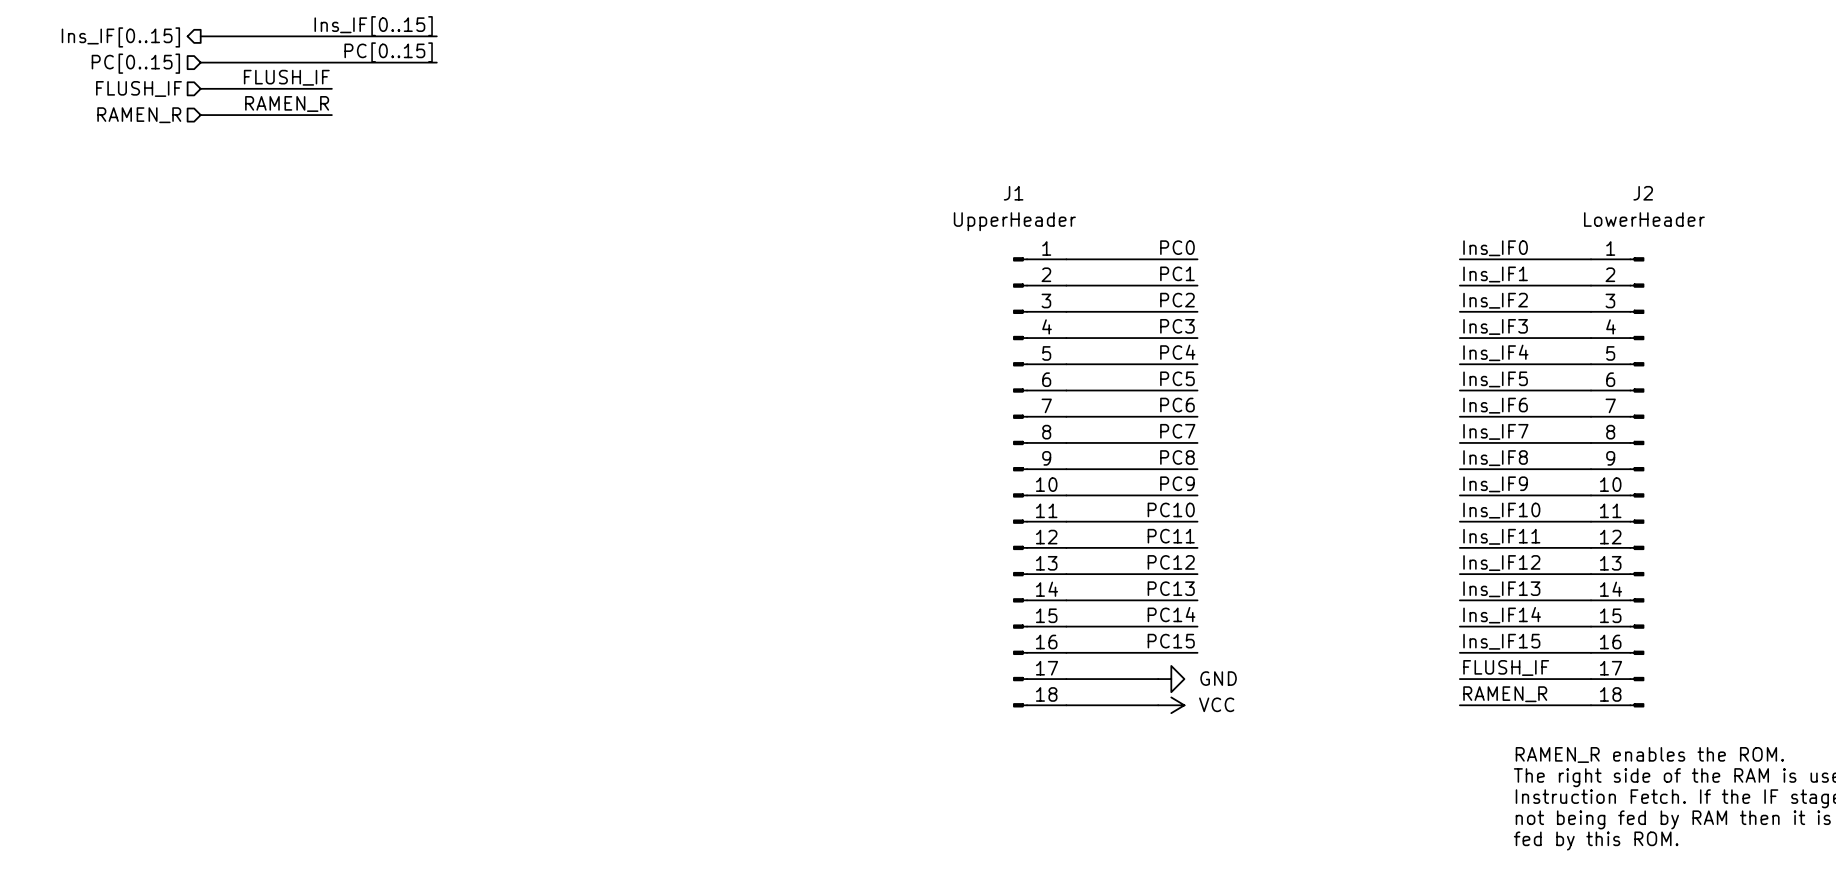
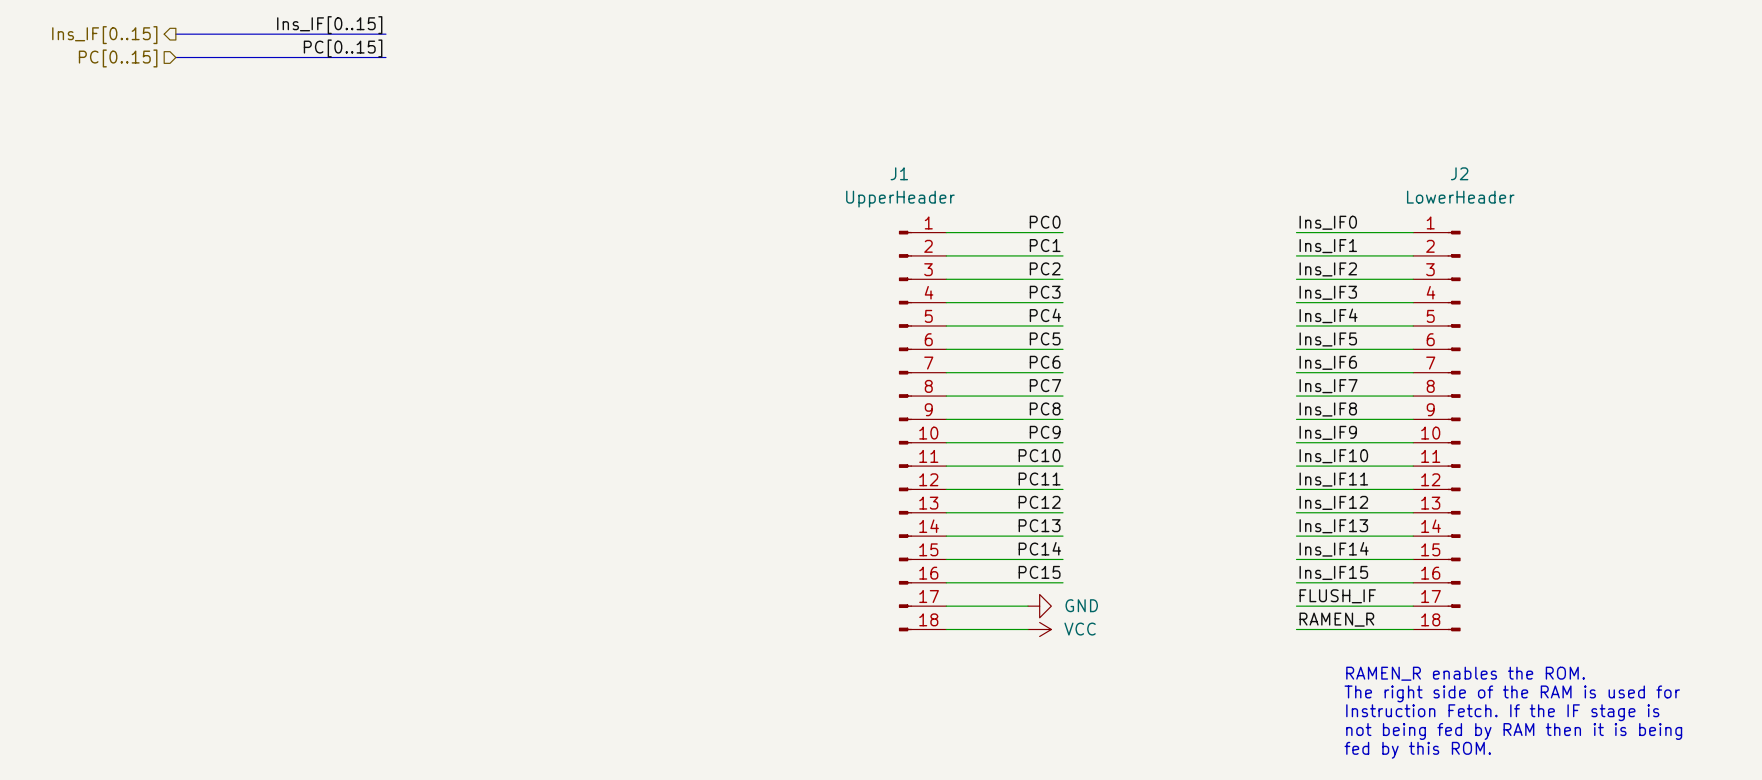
label: FLUSH_IF (286, 77) -> none
hierarchical label: FLUSH_IF (138, 88) -> none
wire: (200, 88) (331, 88) -> none
label: RAMEN_R (287, 103) -> none
hierarchical label: RAMEN_R (139, 115) -> none
wire: (200, 115) (331, 115) -> none

